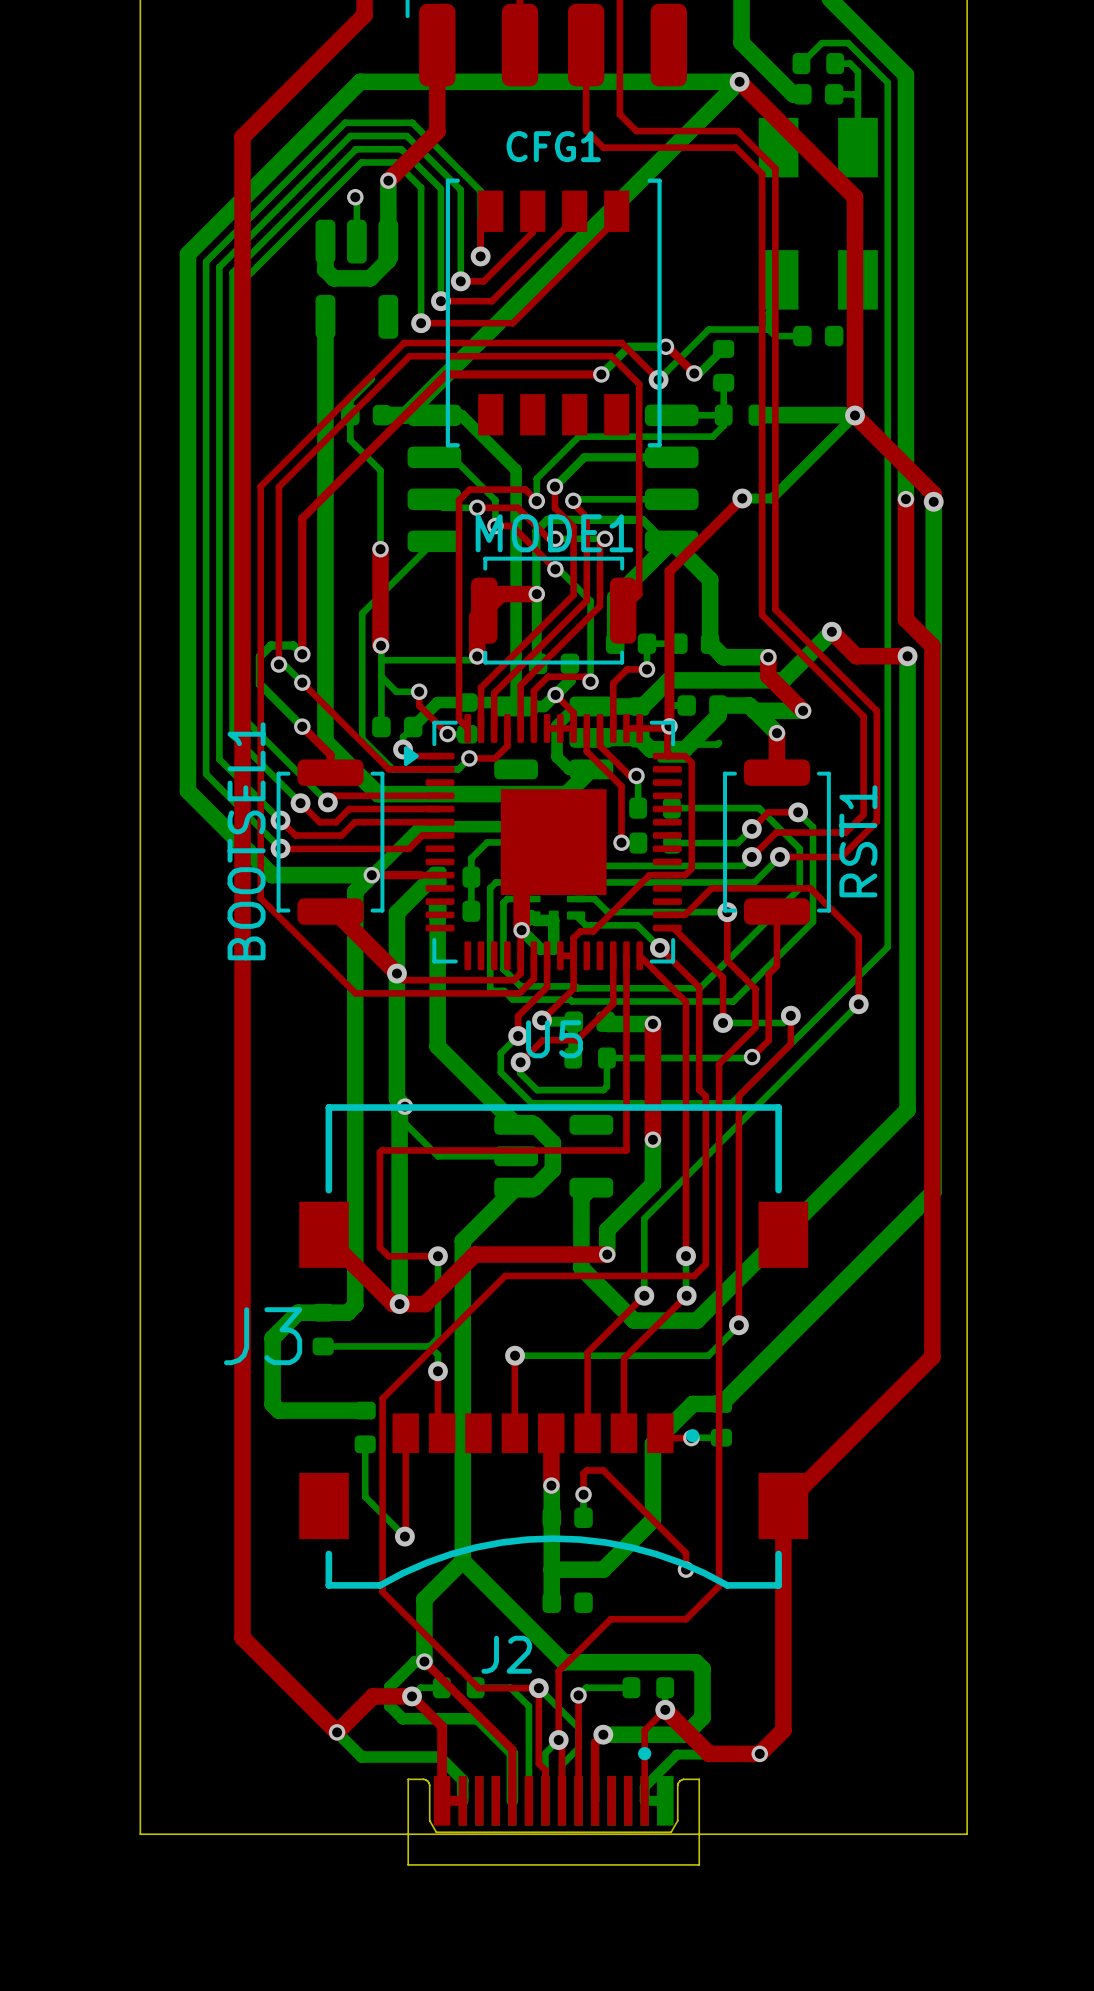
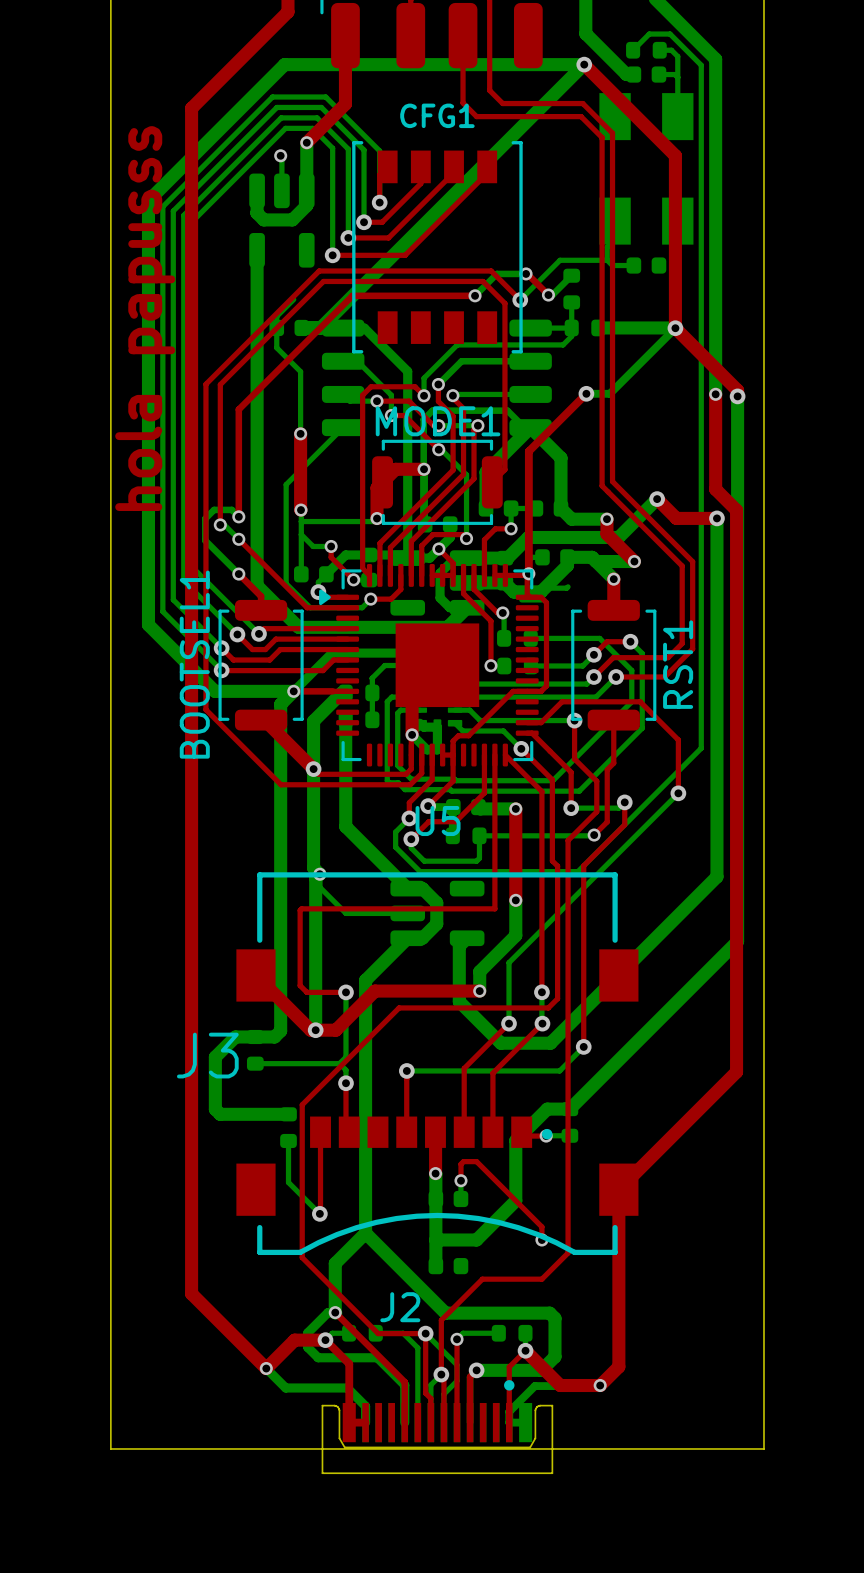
text: none -> hola papusss (145, 318)

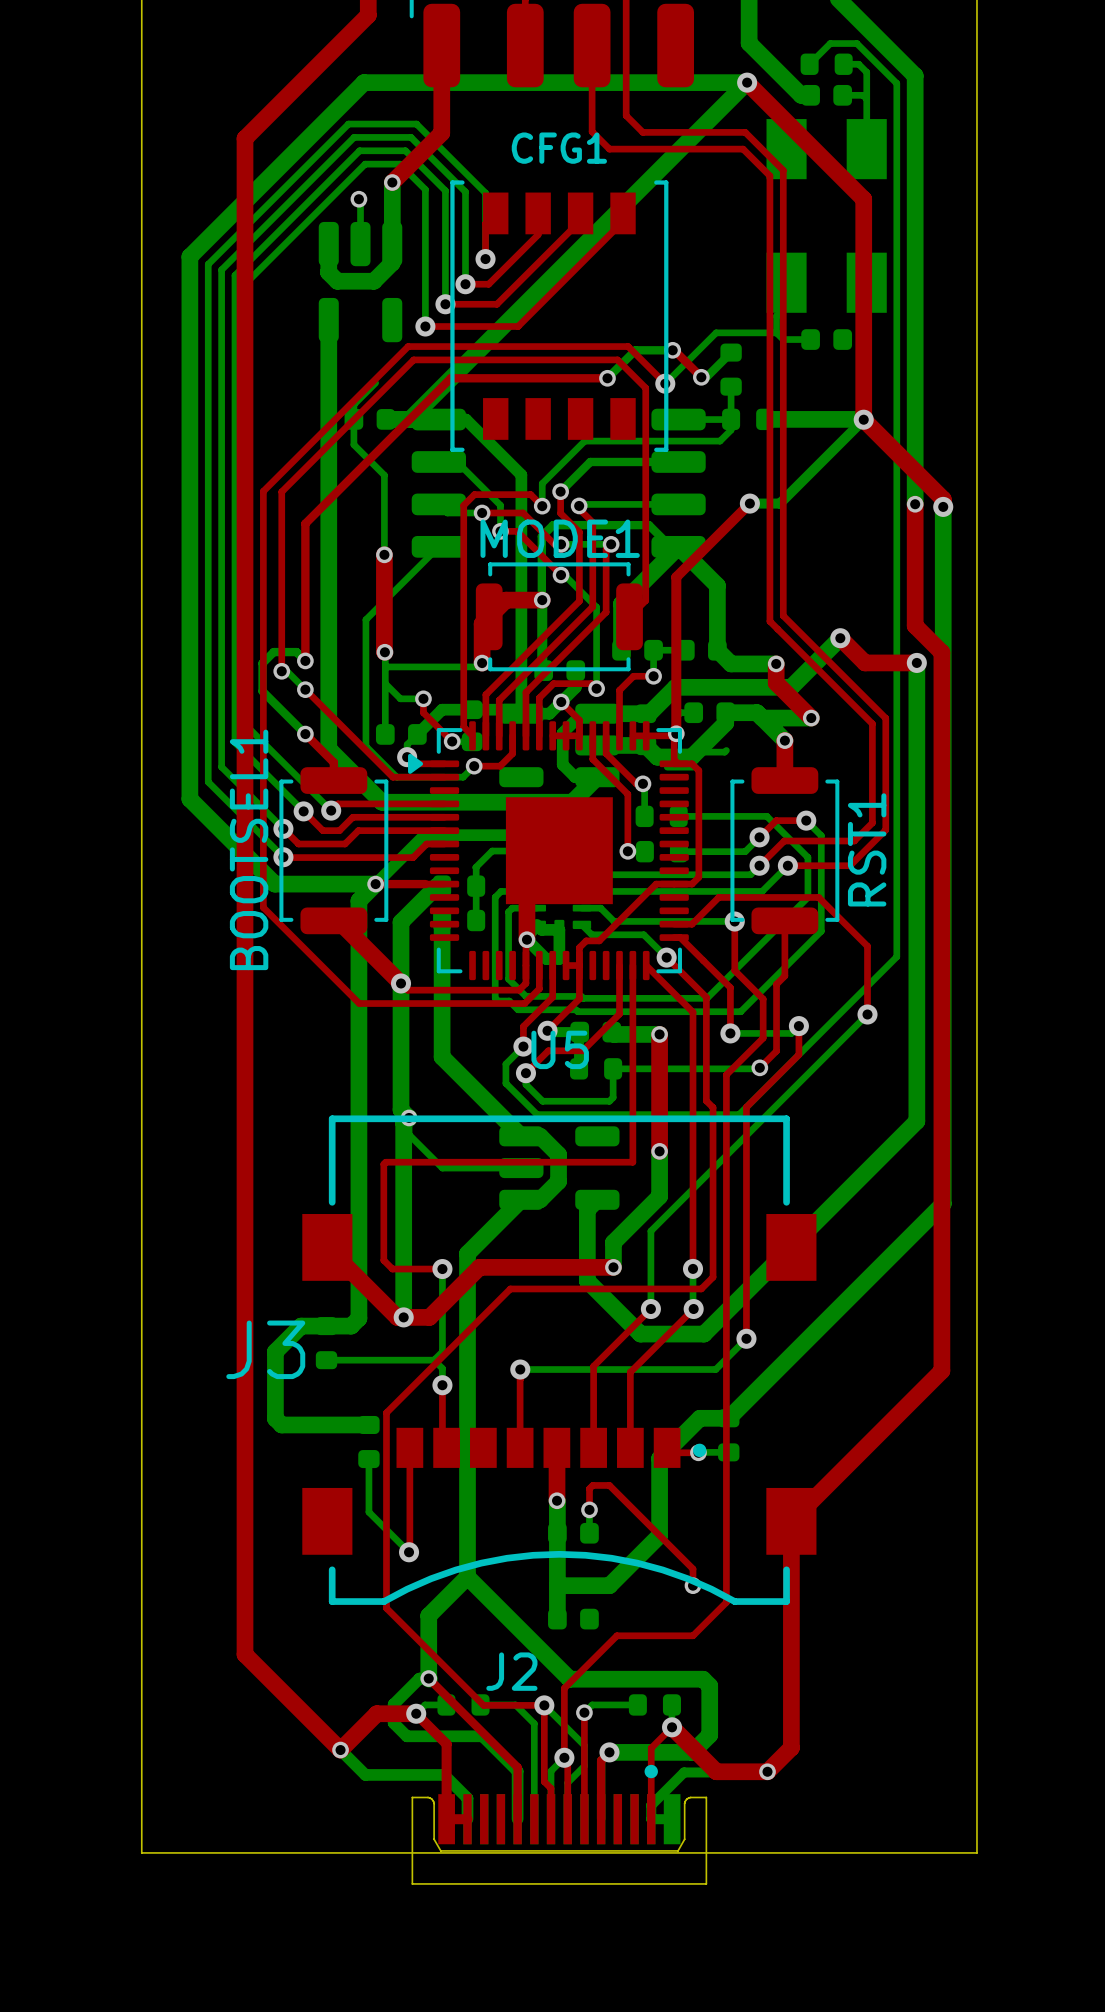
text: hola papusss (145, 318) -> none

